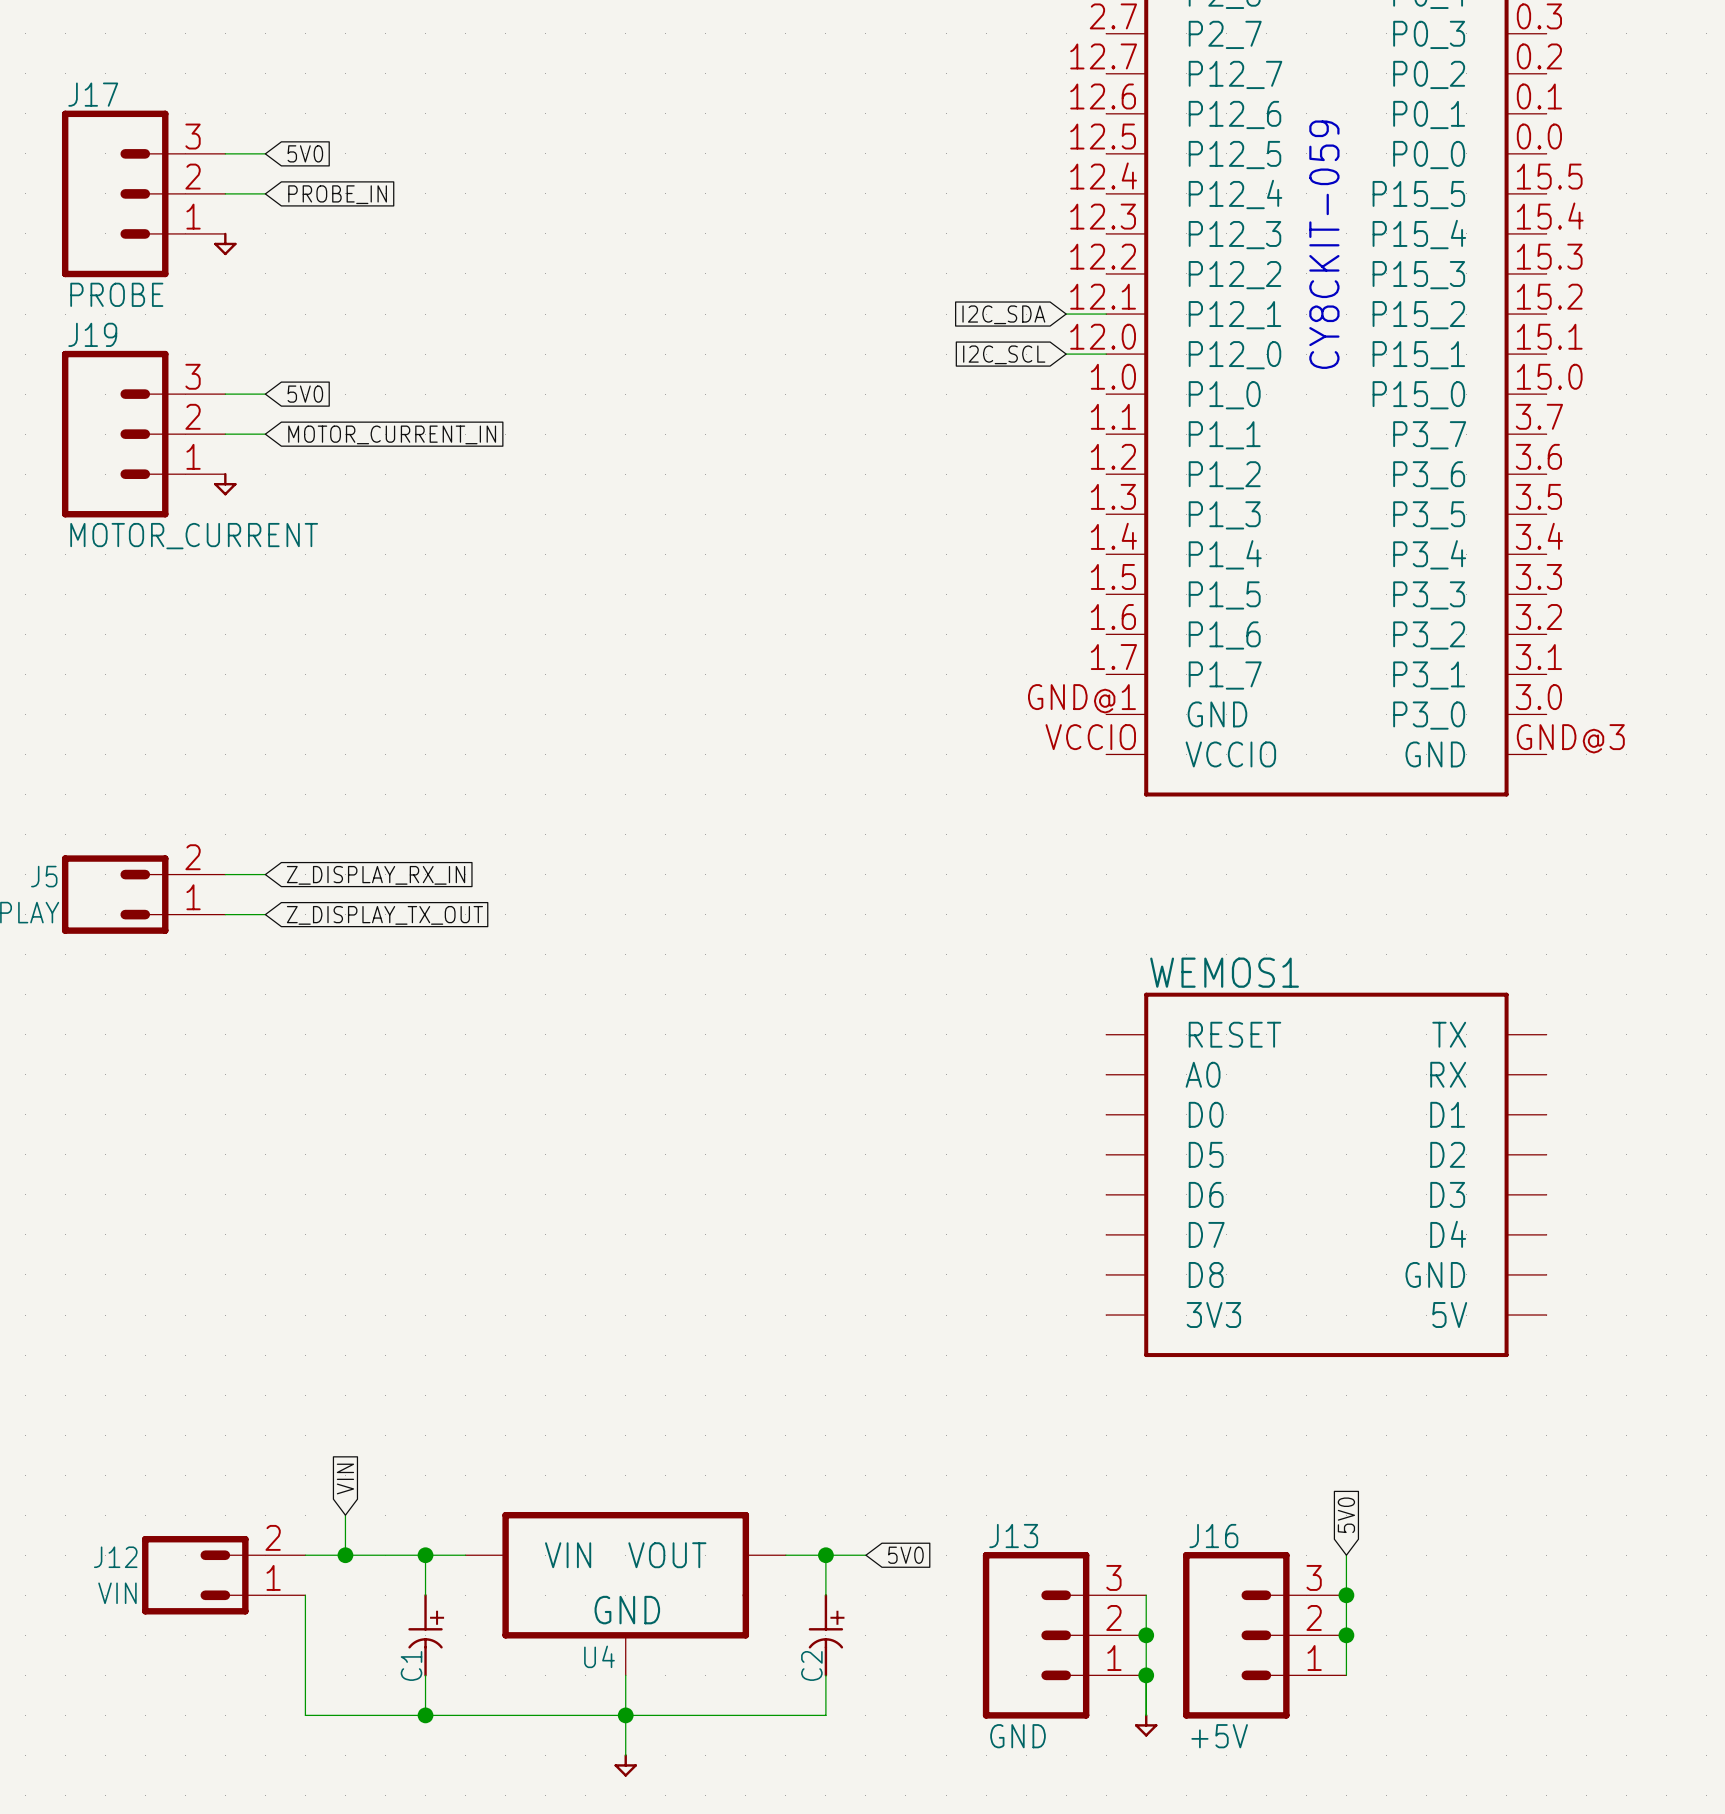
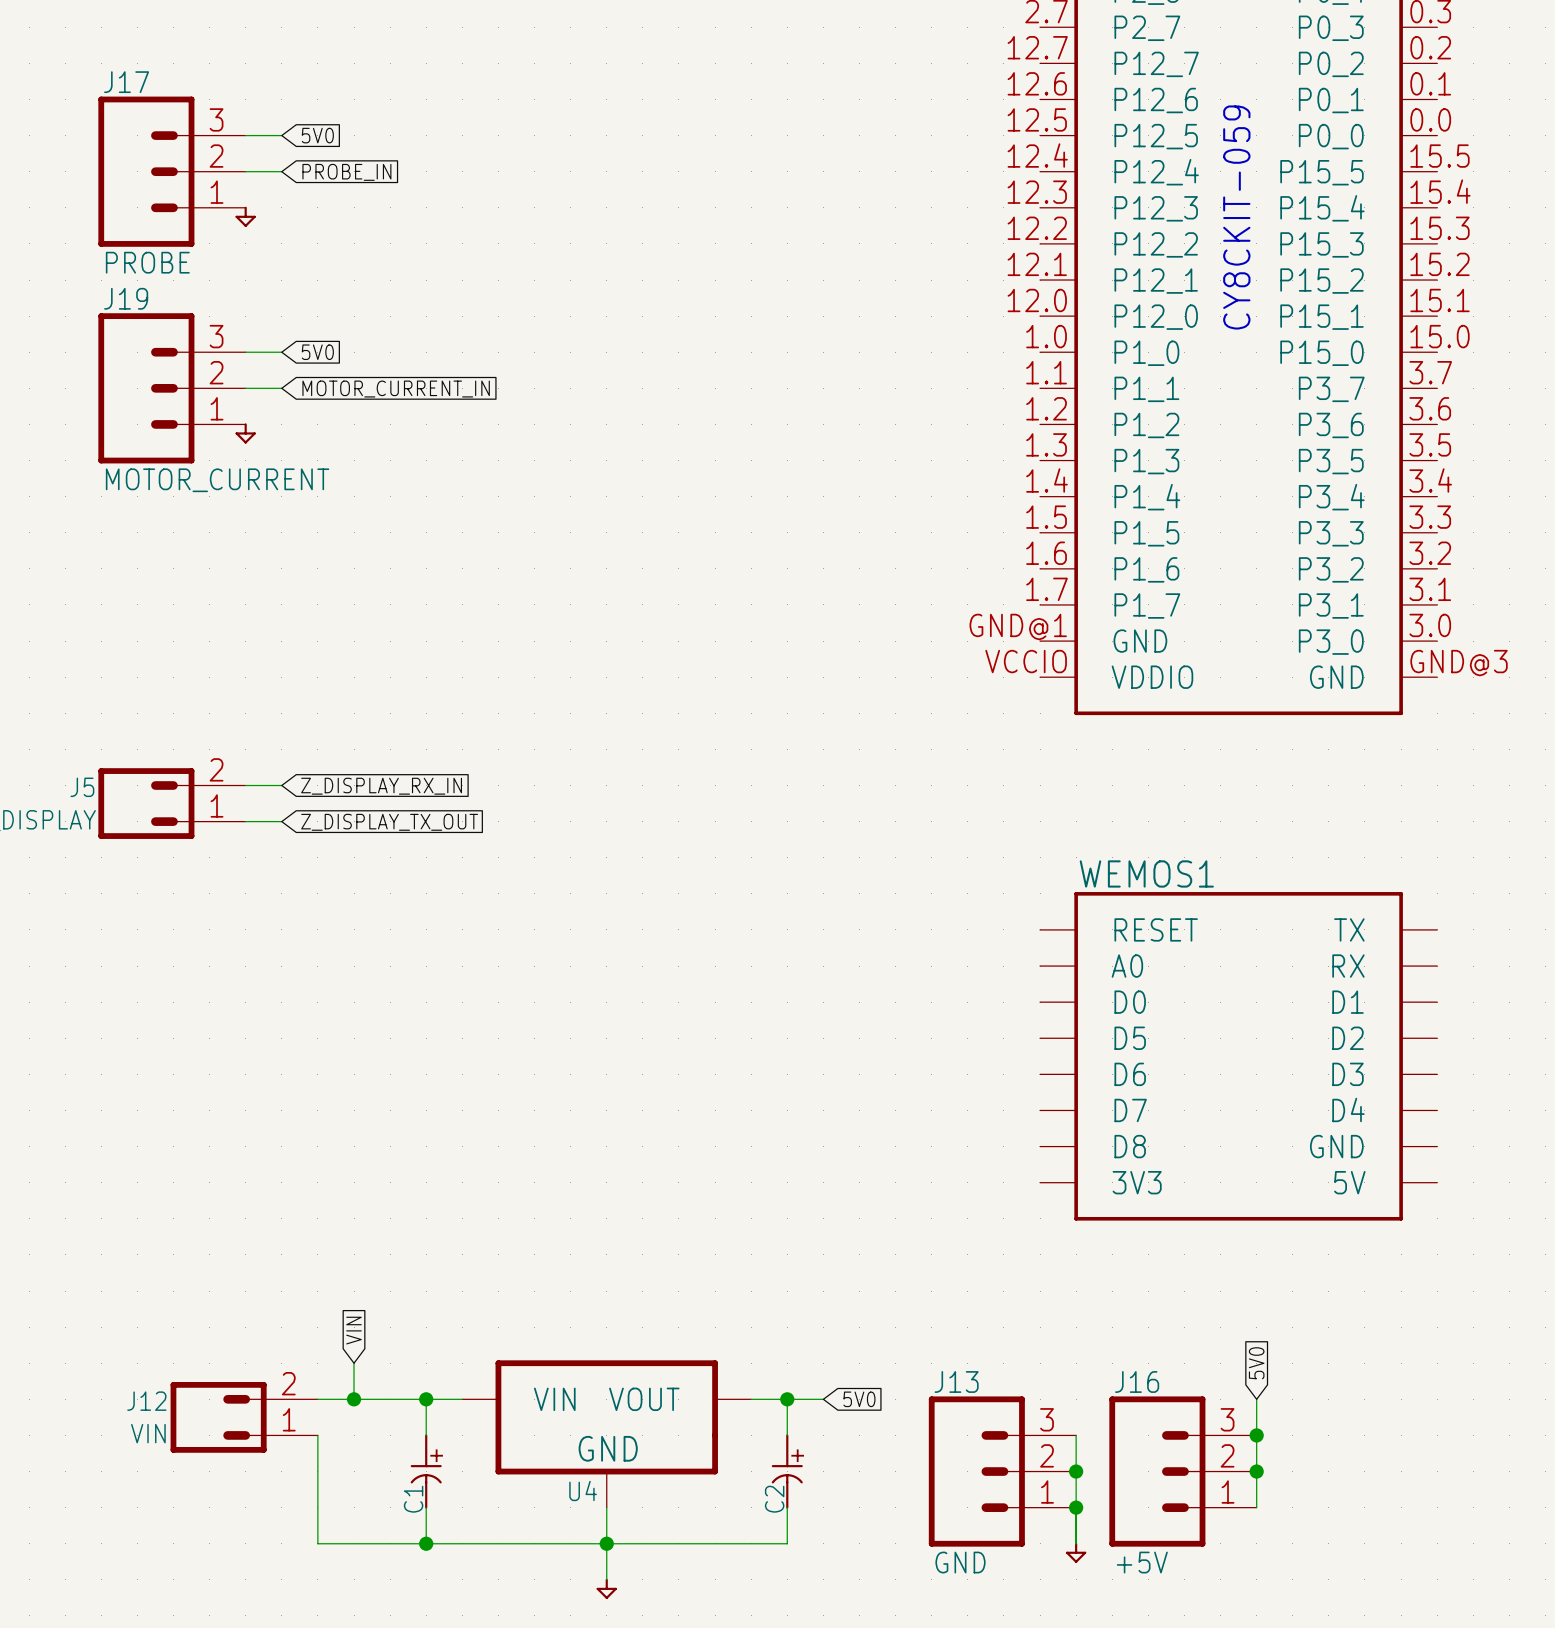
global label: I2C_SDA (1003, 314) -> none
wire: (1066, 314) (1106, 314) -> none
global label: I2C_SCL (1004, 354) -> none
wire: (1066, 354) (1106, 354) -> none
part pin name: VCCIO (1230, 754) -> VDDIO (1152, 677)

